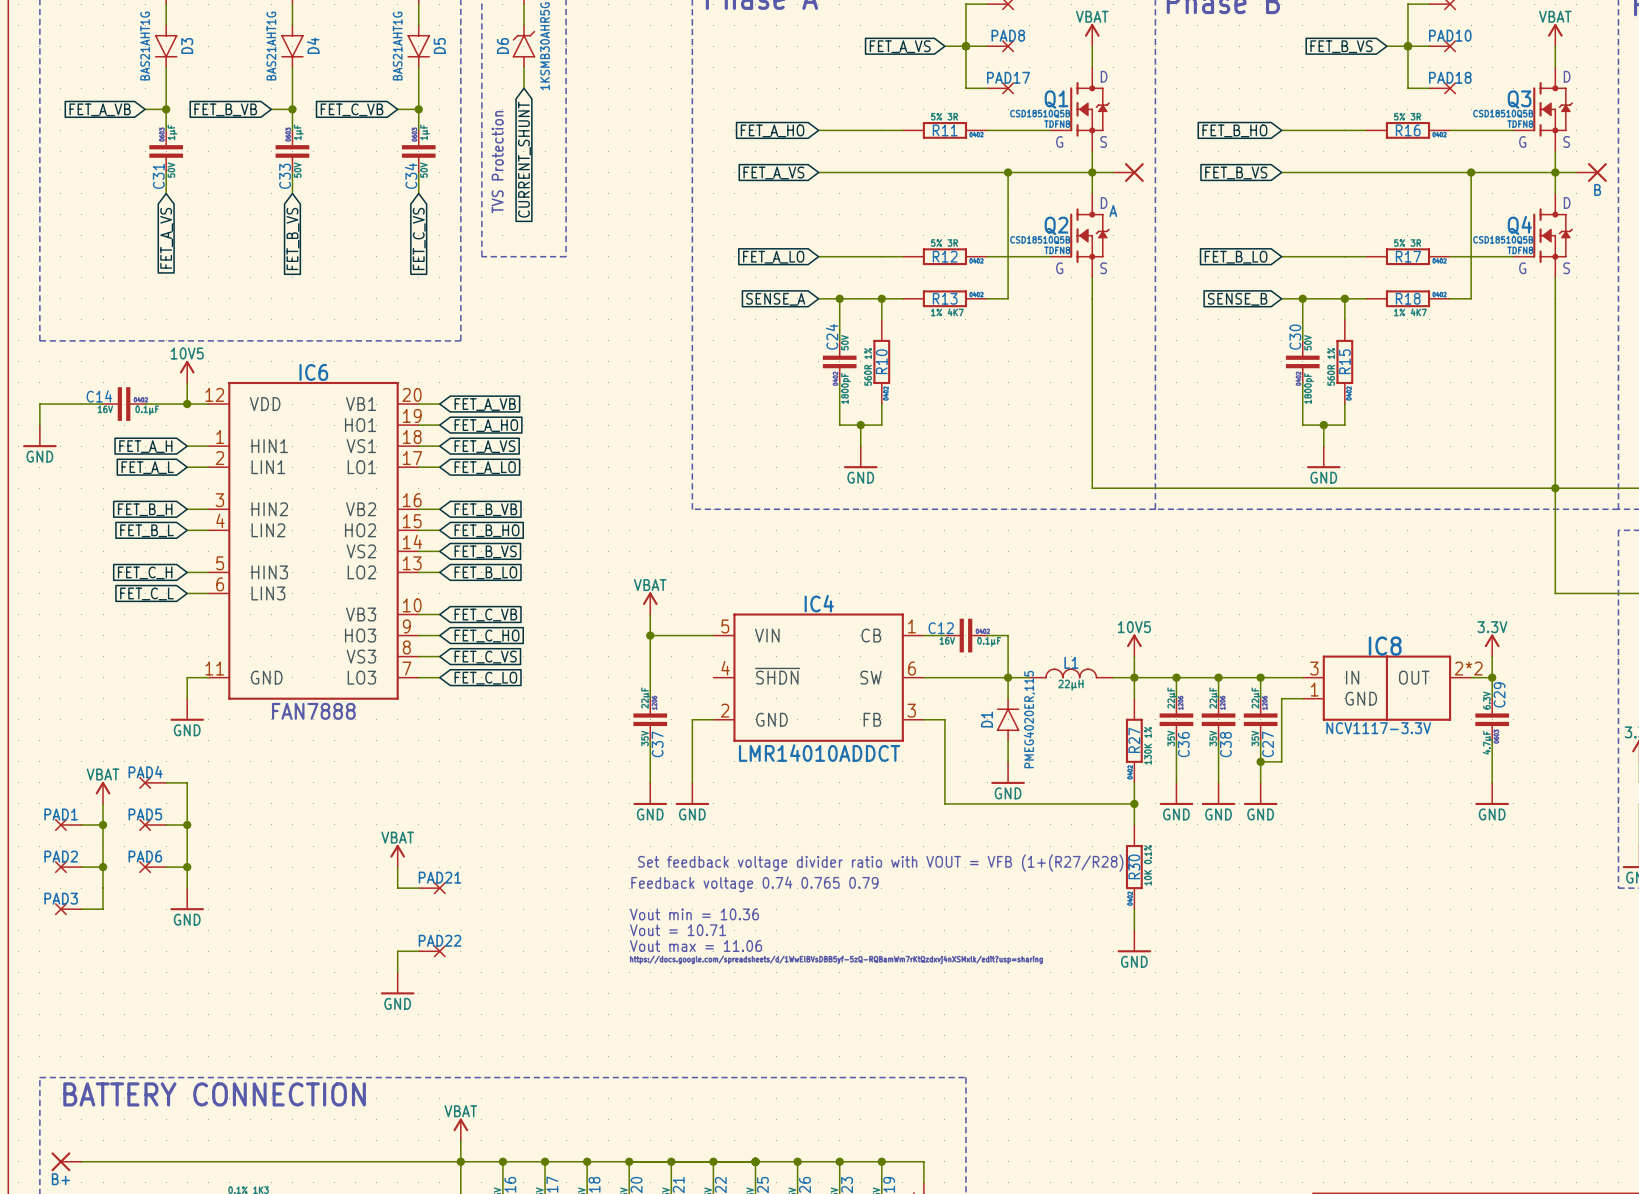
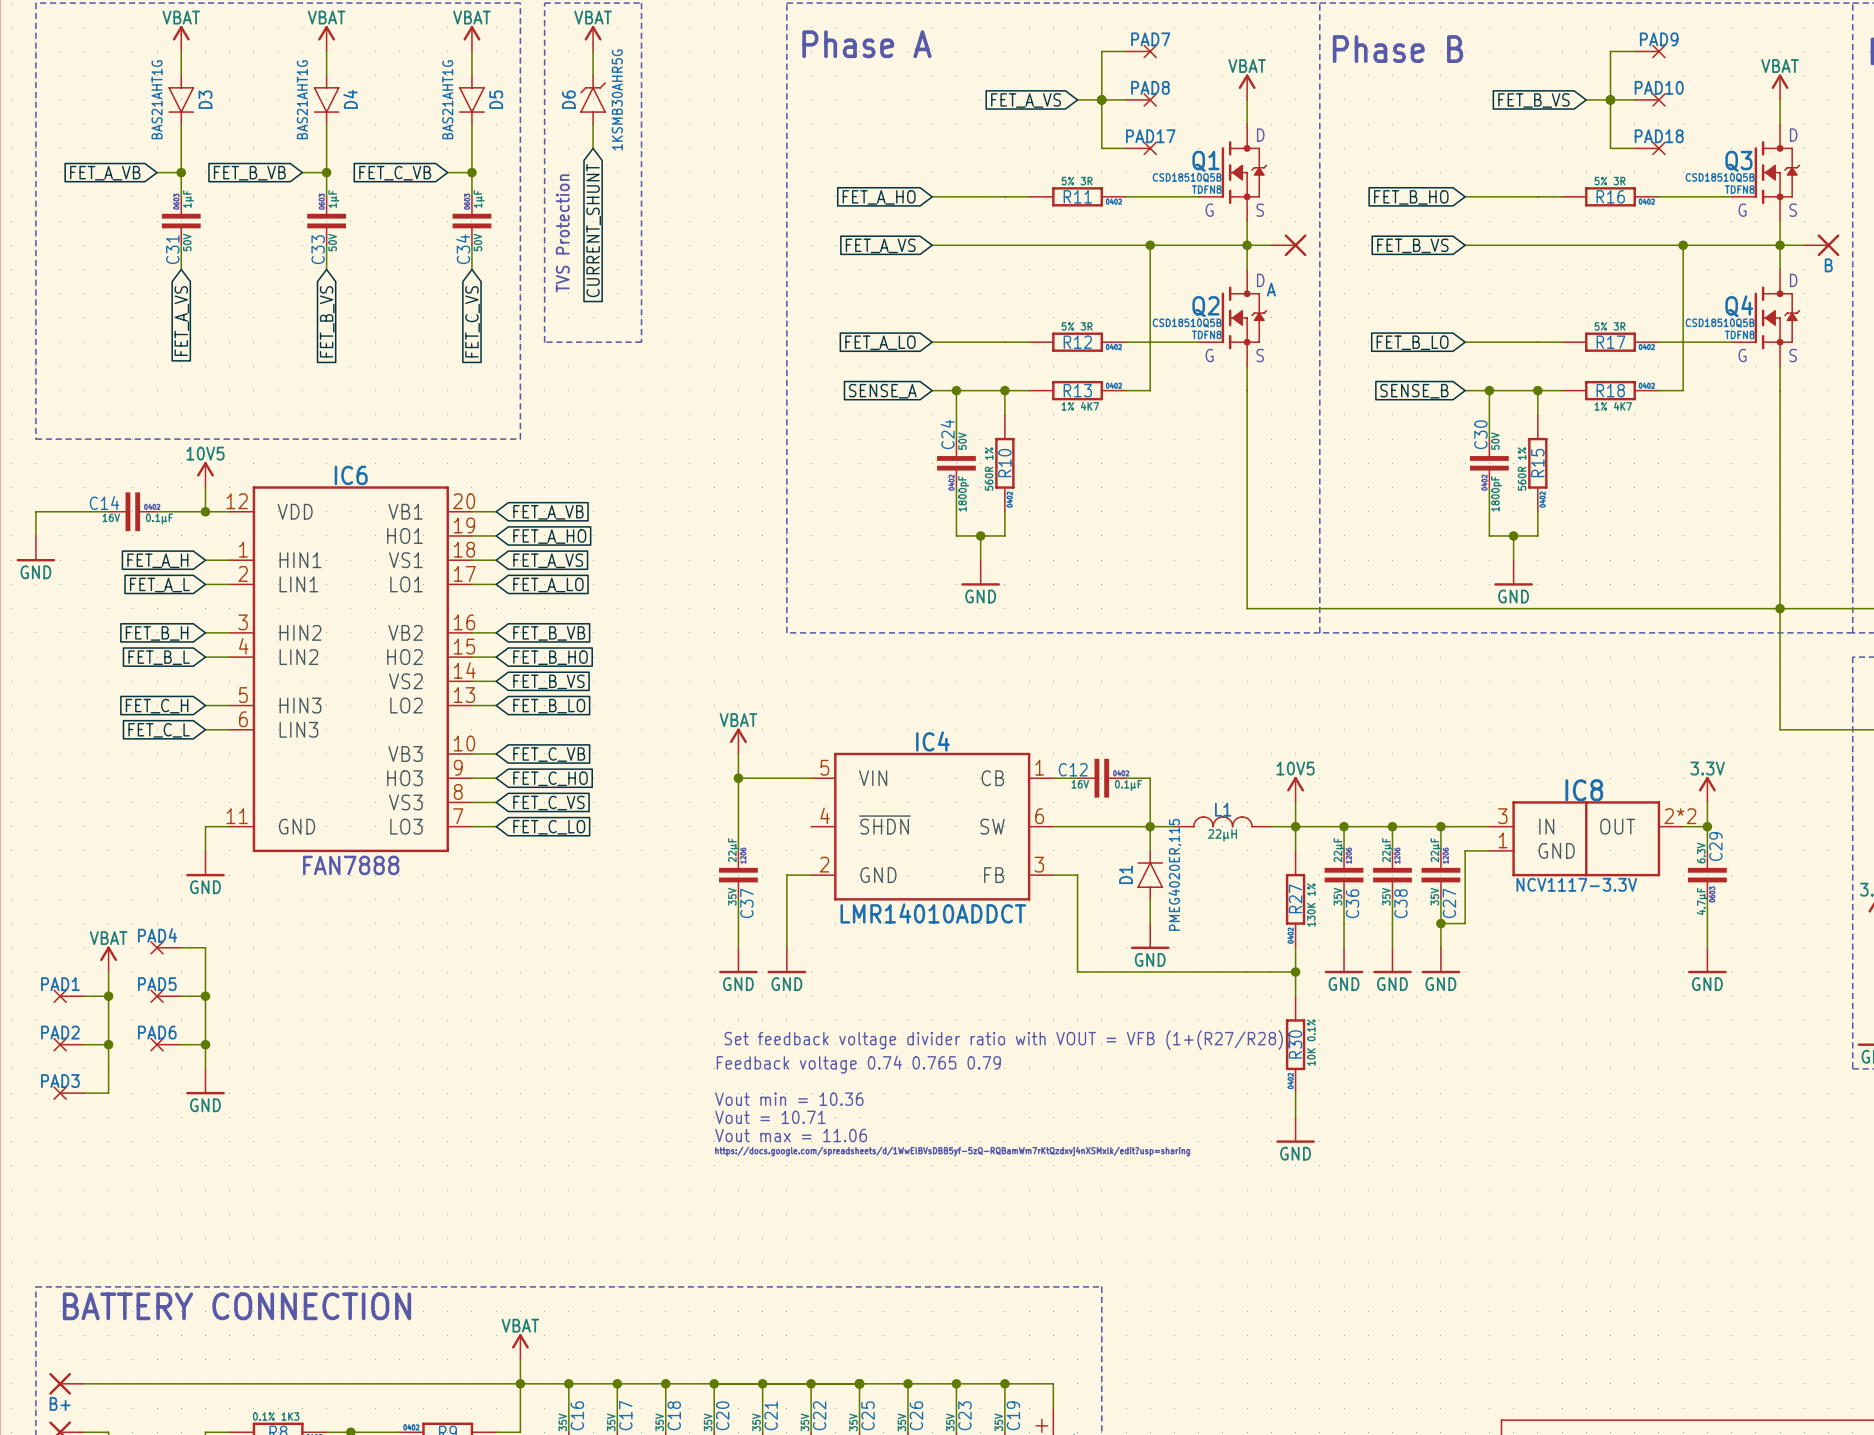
power symbol: VBAT (397, 856) -> none
wire: (397, 867) (397, 888) (418, 888) -> none
PAD21: (432, 888) -> none
wire: (418, 951) (397, 951) (397, 972) -> none
PAD22: (432, 951) -> none
power symbol: GND (397, 983) -> none

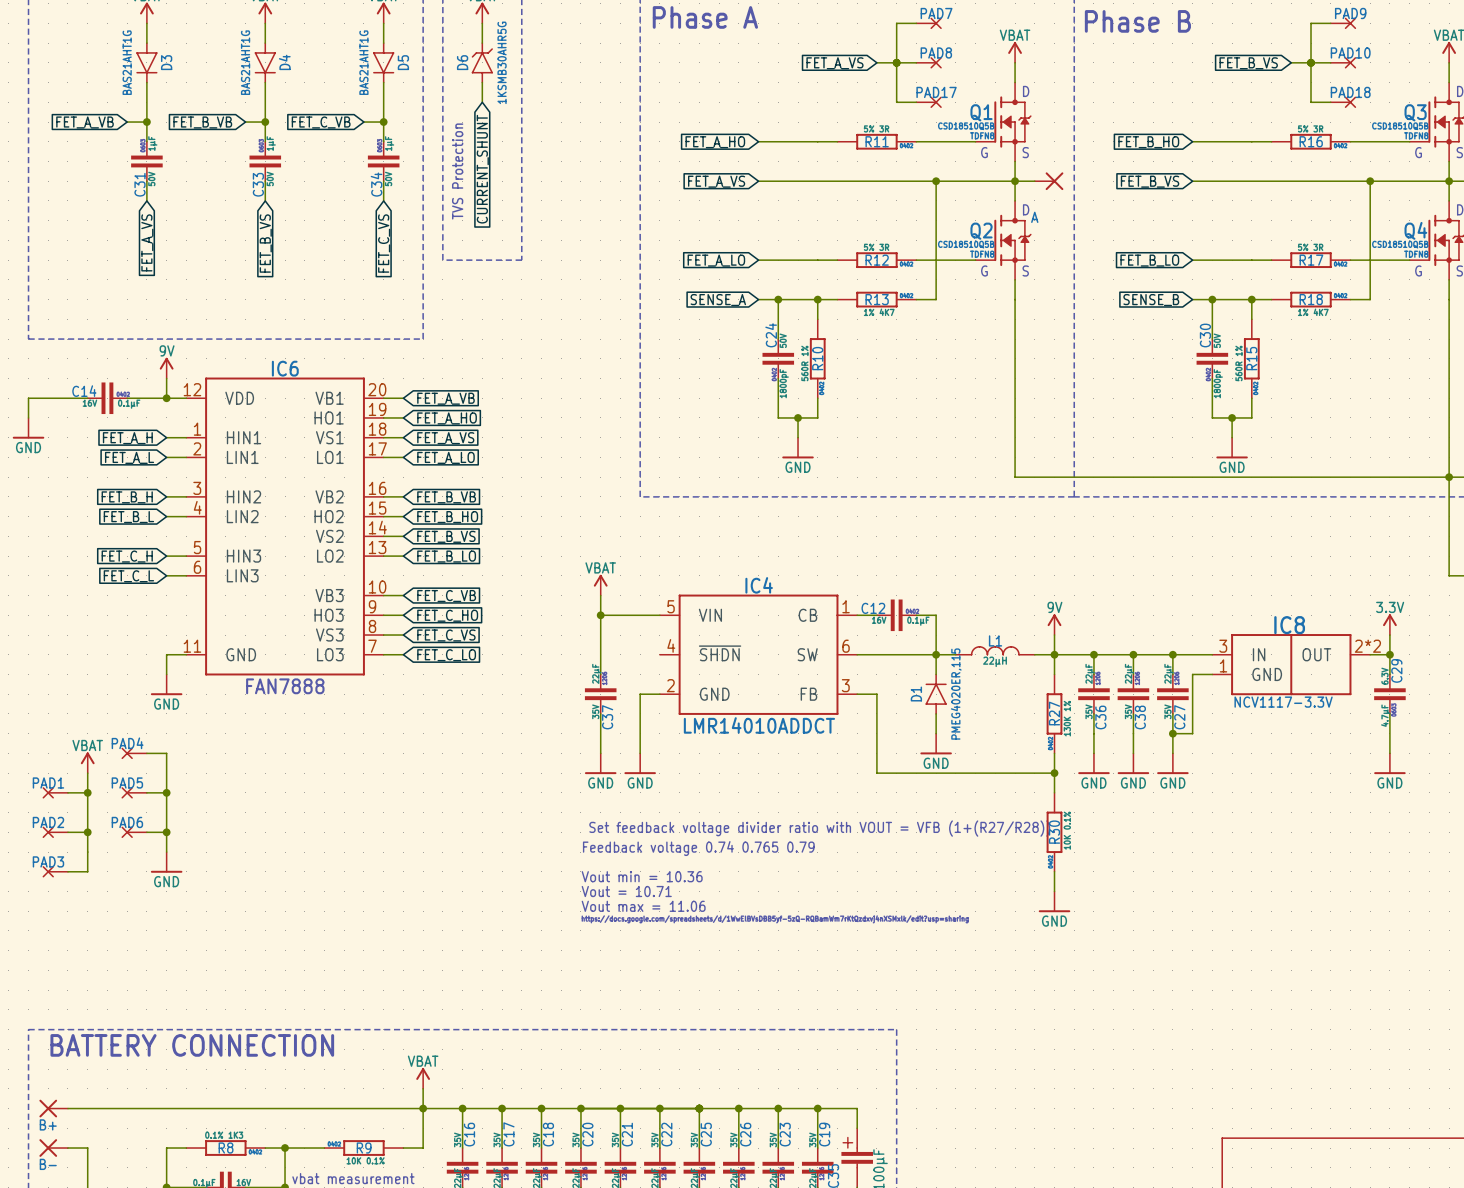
power symbol: 10V5 (205, 474) -> 9V (166, 368)
power symbol: 10V5 (1295, 789) -> 9V (1054, 624)

